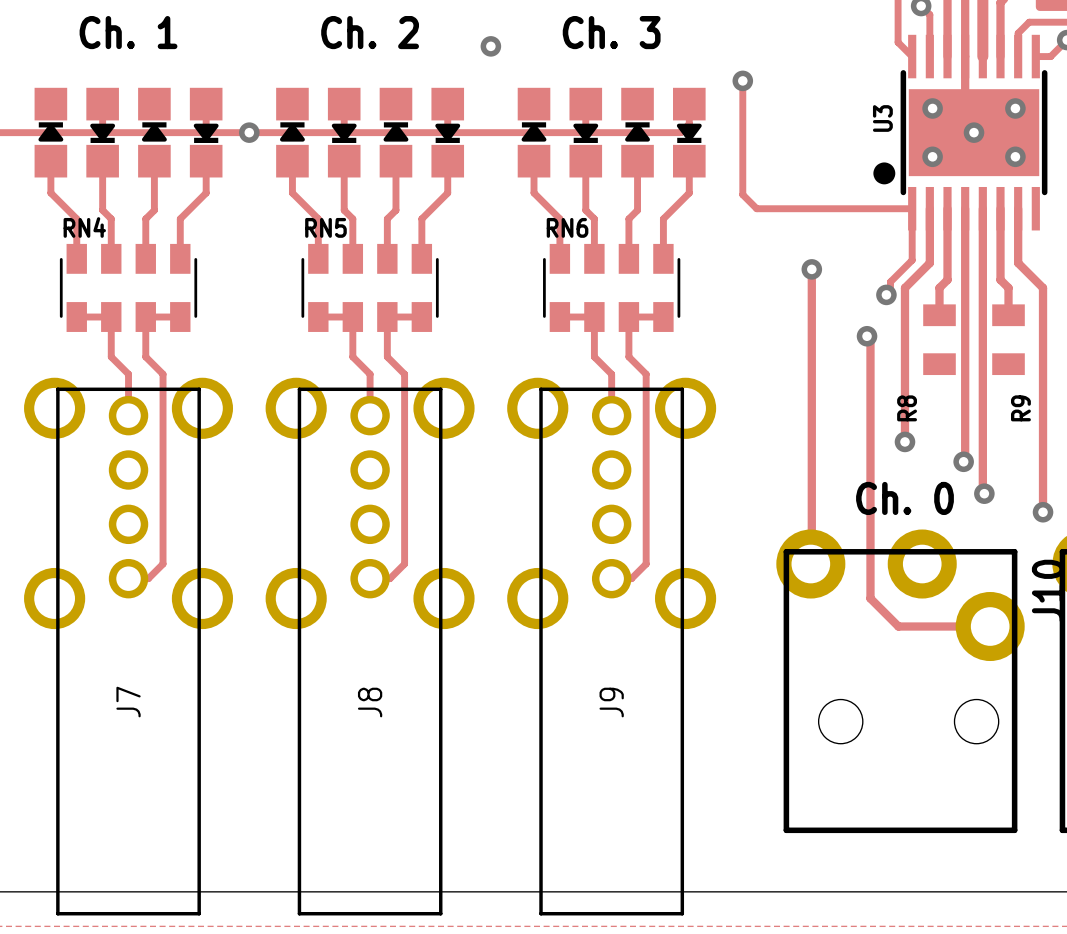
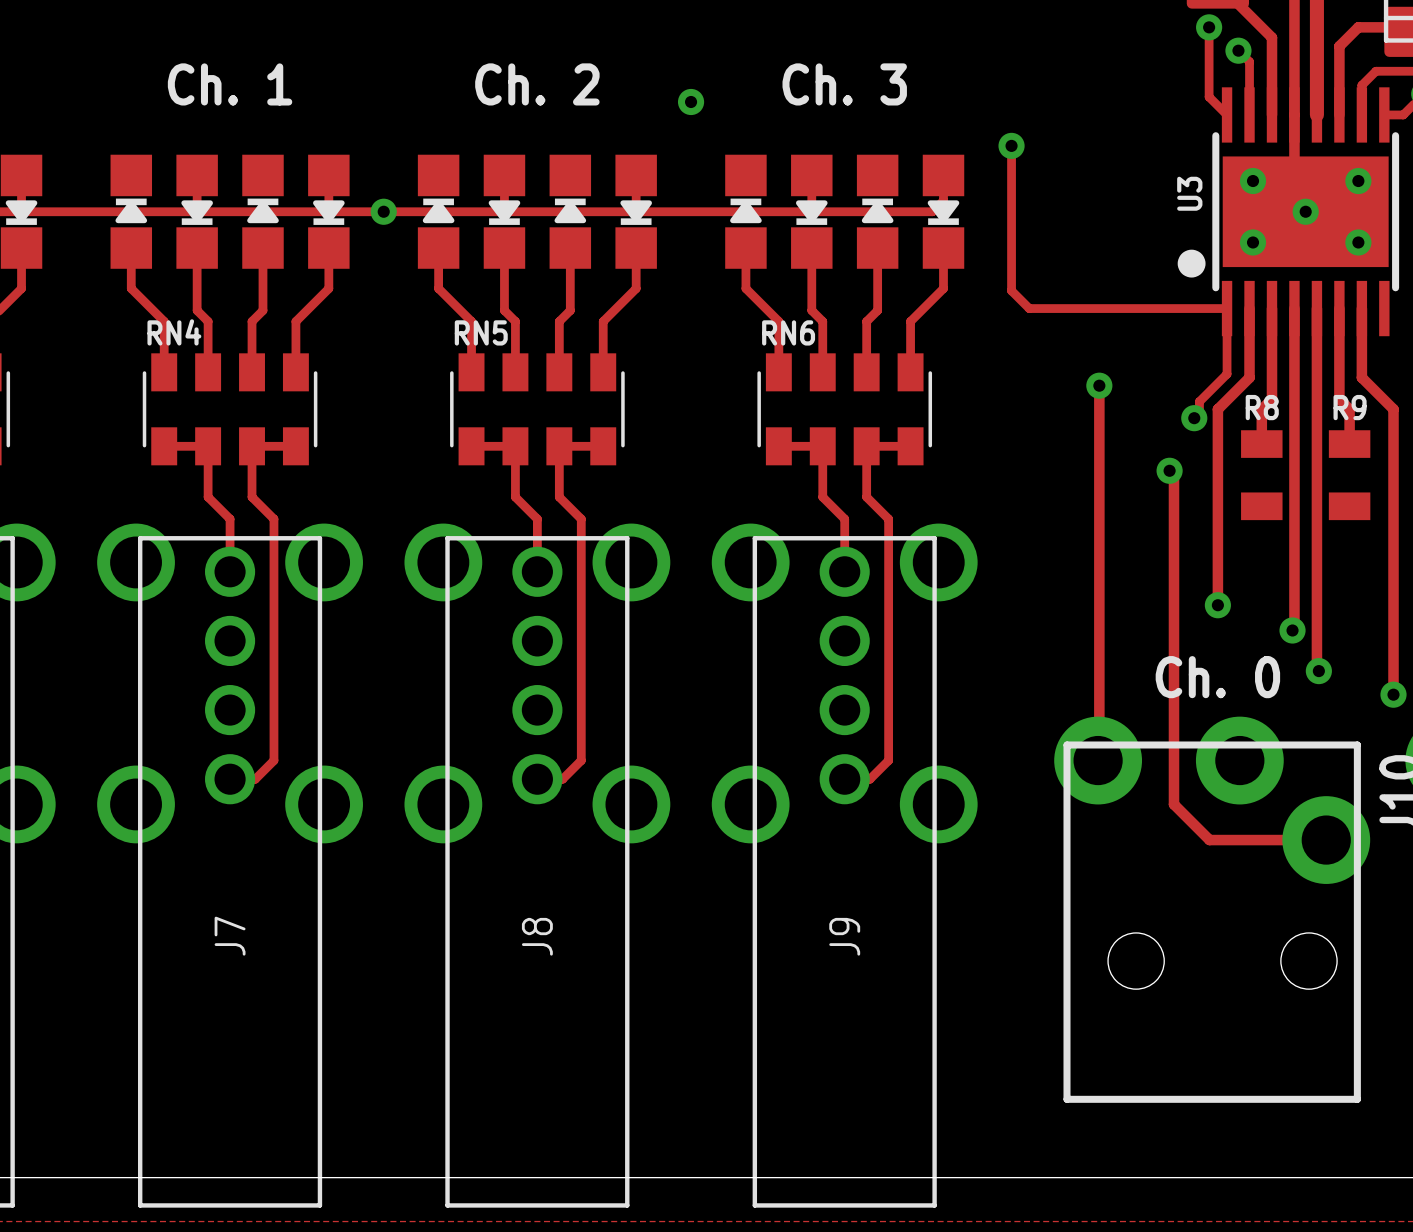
R8 name rotation: 0° (907, 408) -> 90° clockwise (1262, 407)
R8 name position: R8 (907, 408) -> R8 (1262, 407)
R9 name rotation: 0° (1020, 408) -> 90° clockwise (1350, 407)
R9 name position: R9 (1020, 408) -> R9 (1350, 407)

